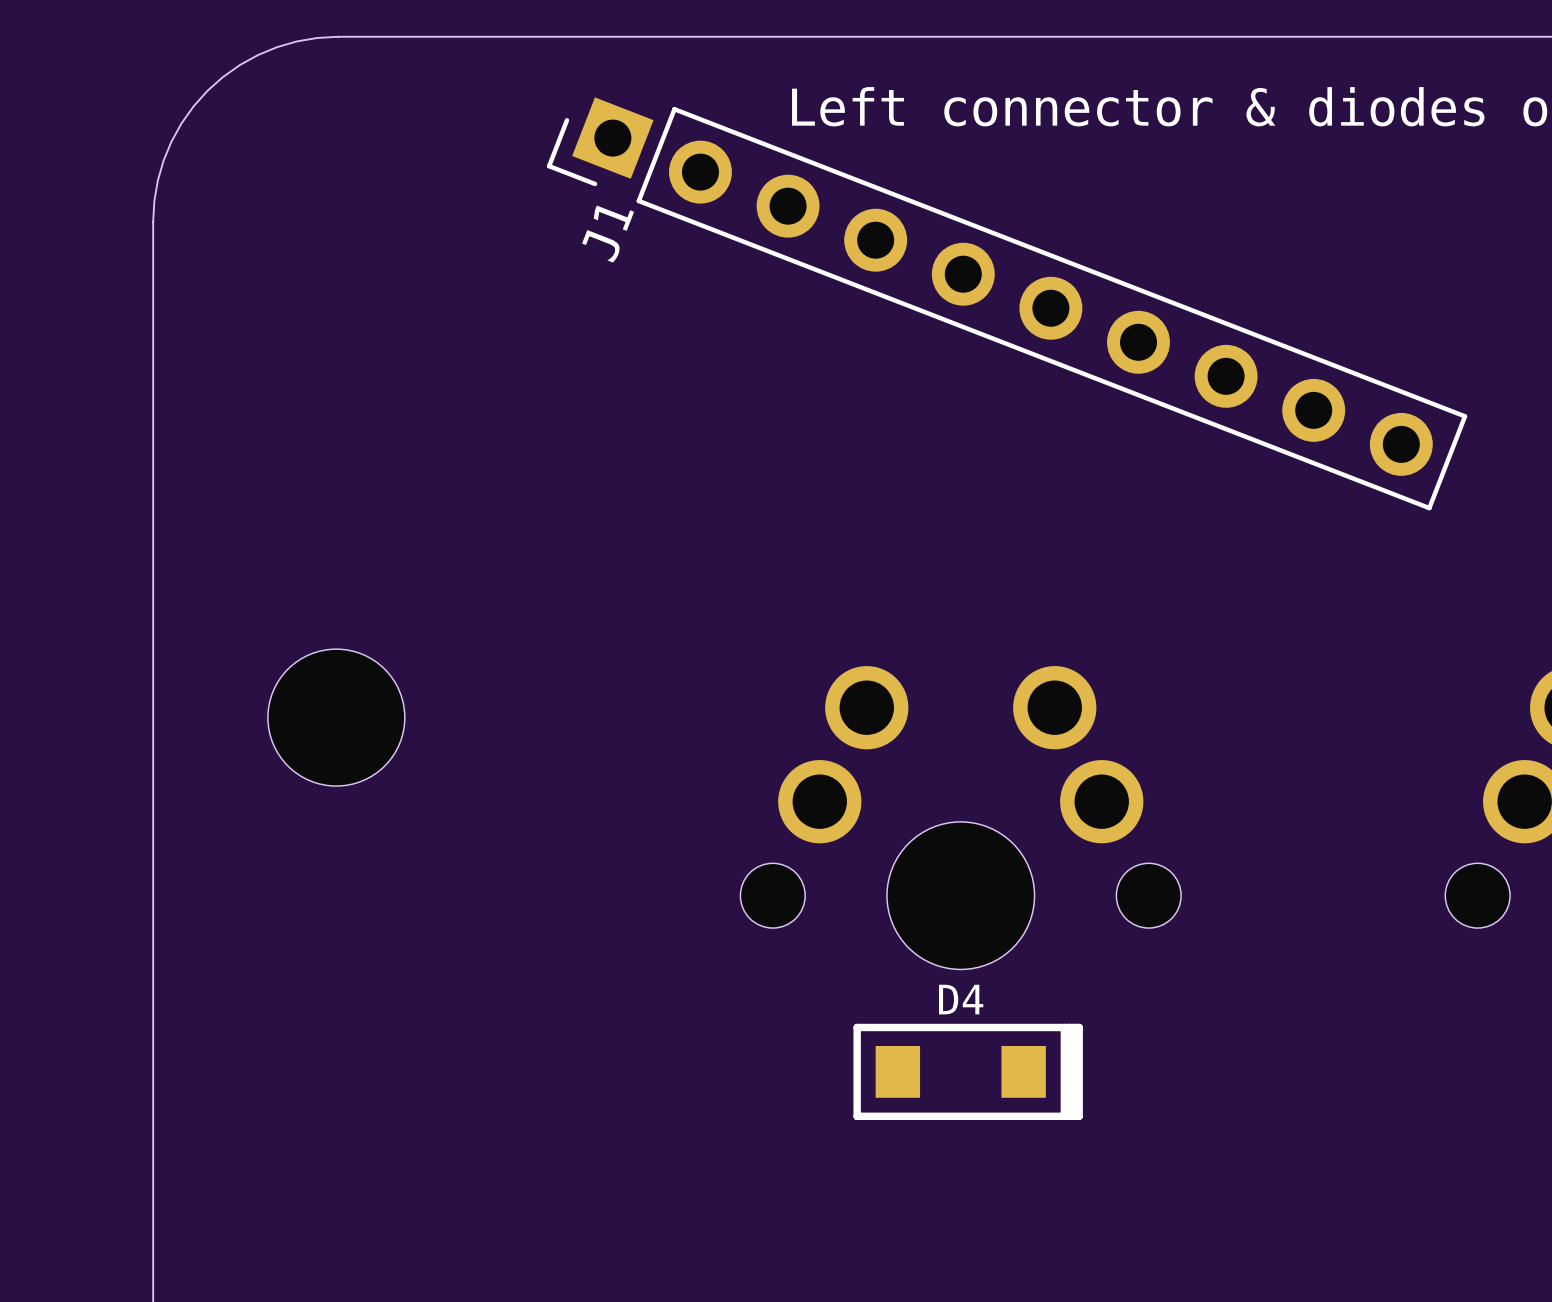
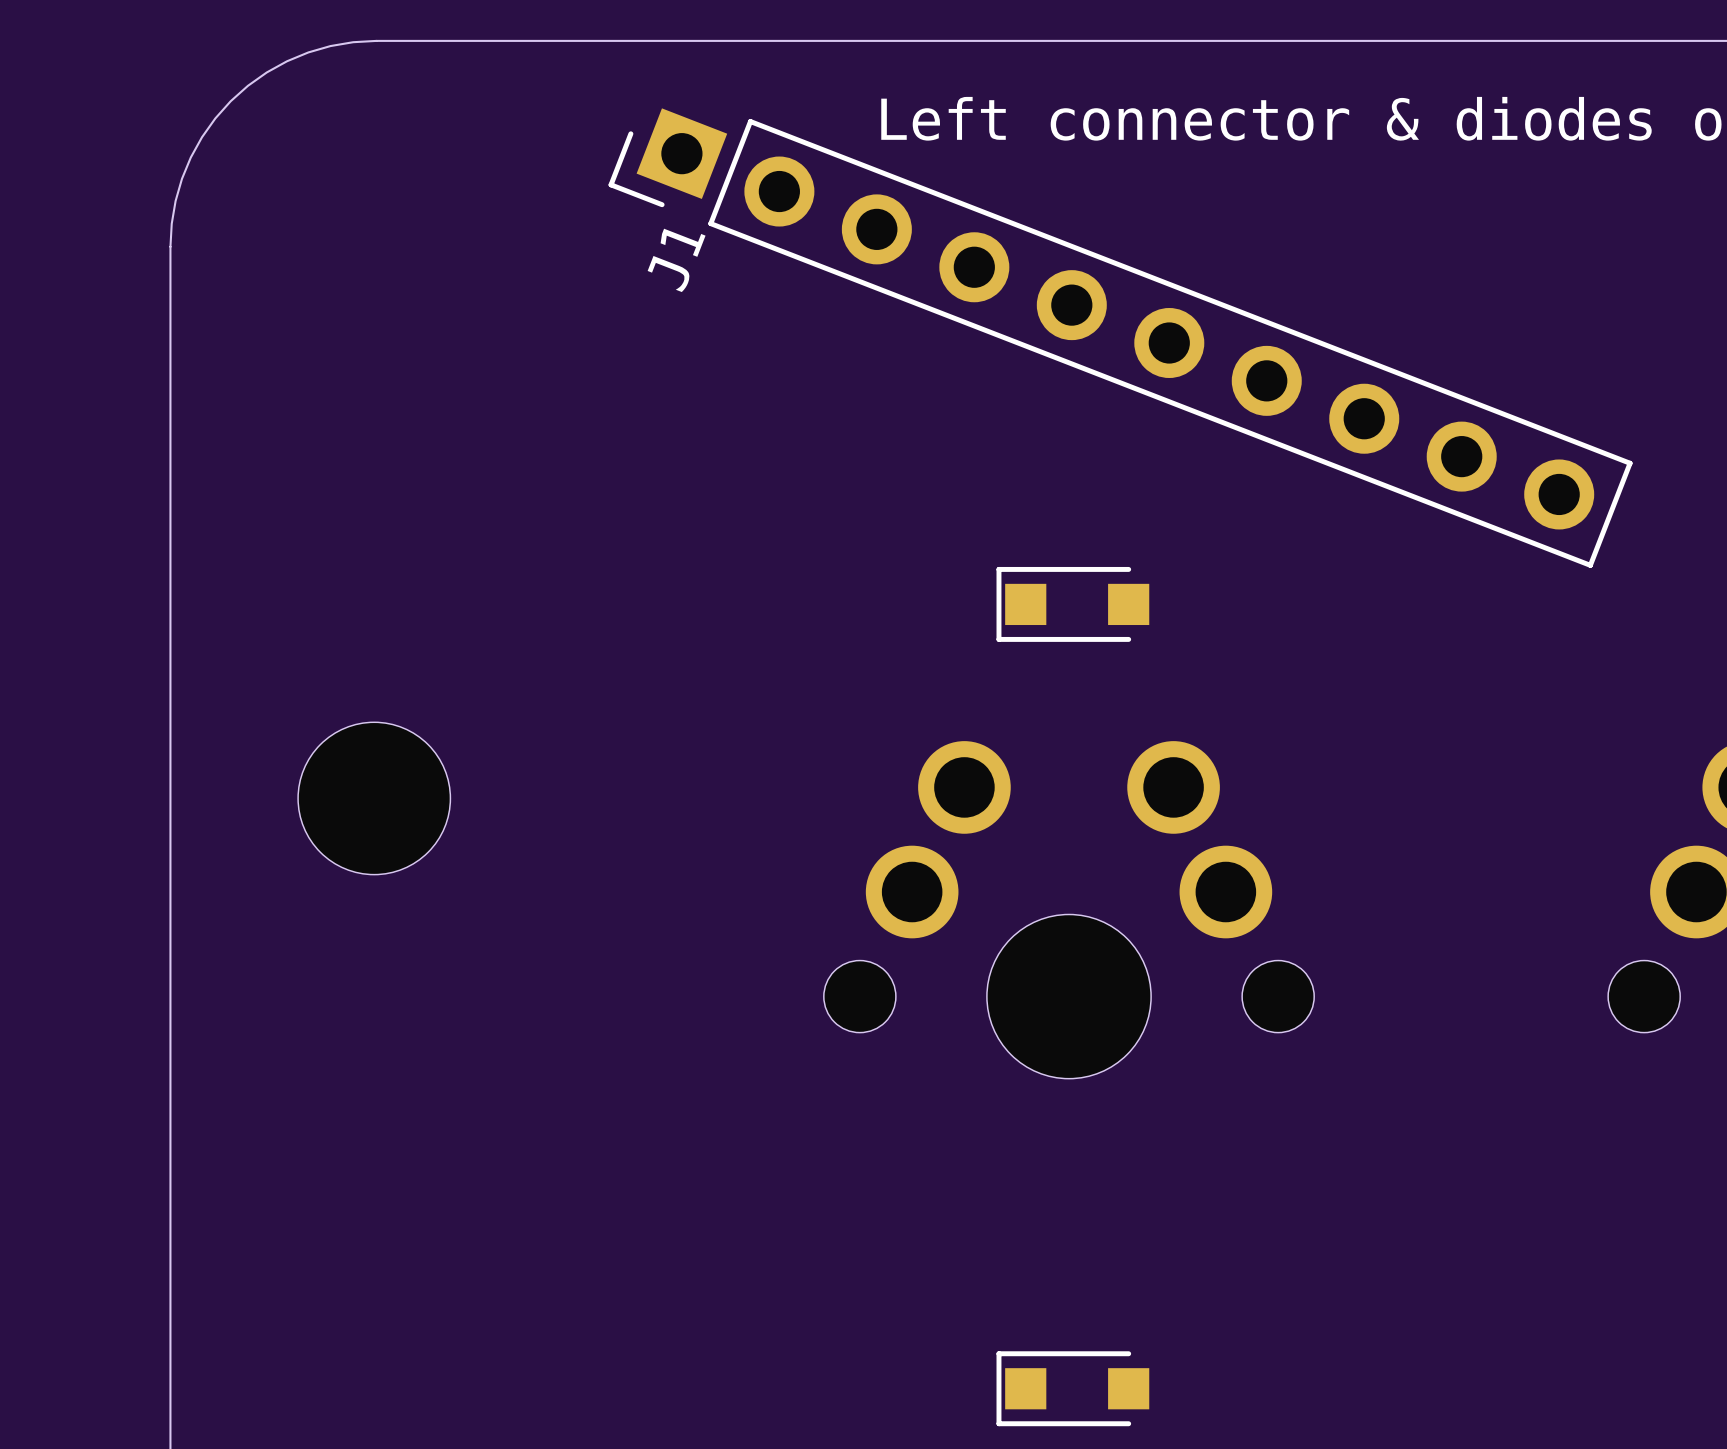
part: none -> (1072, 604)
D4: (968, 1071) -> none
part: none -> (1072, 1388)

